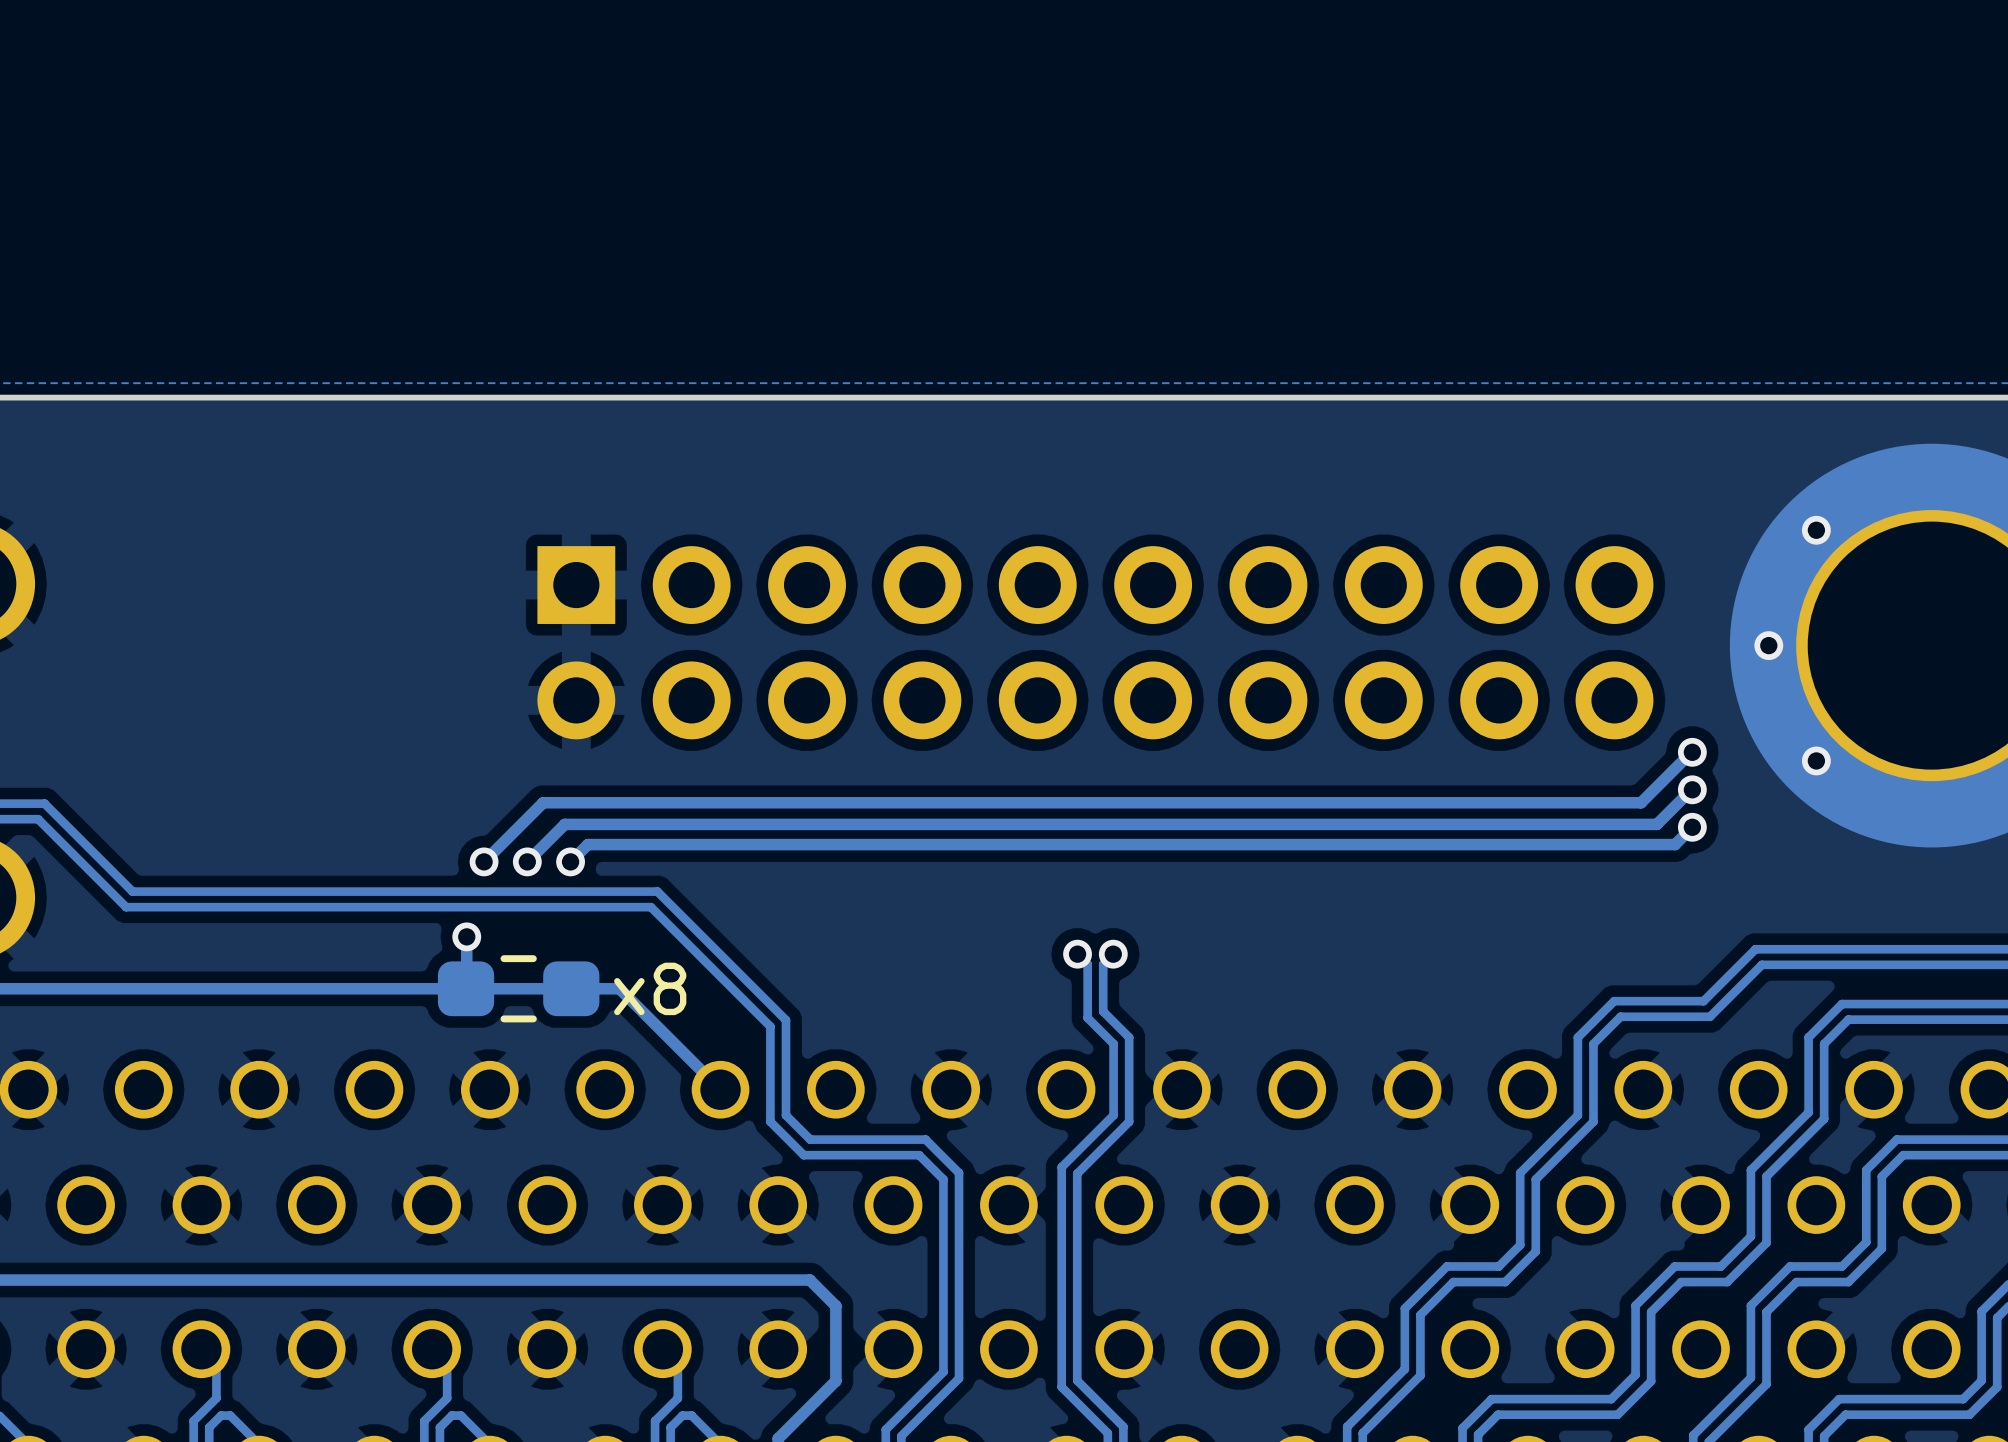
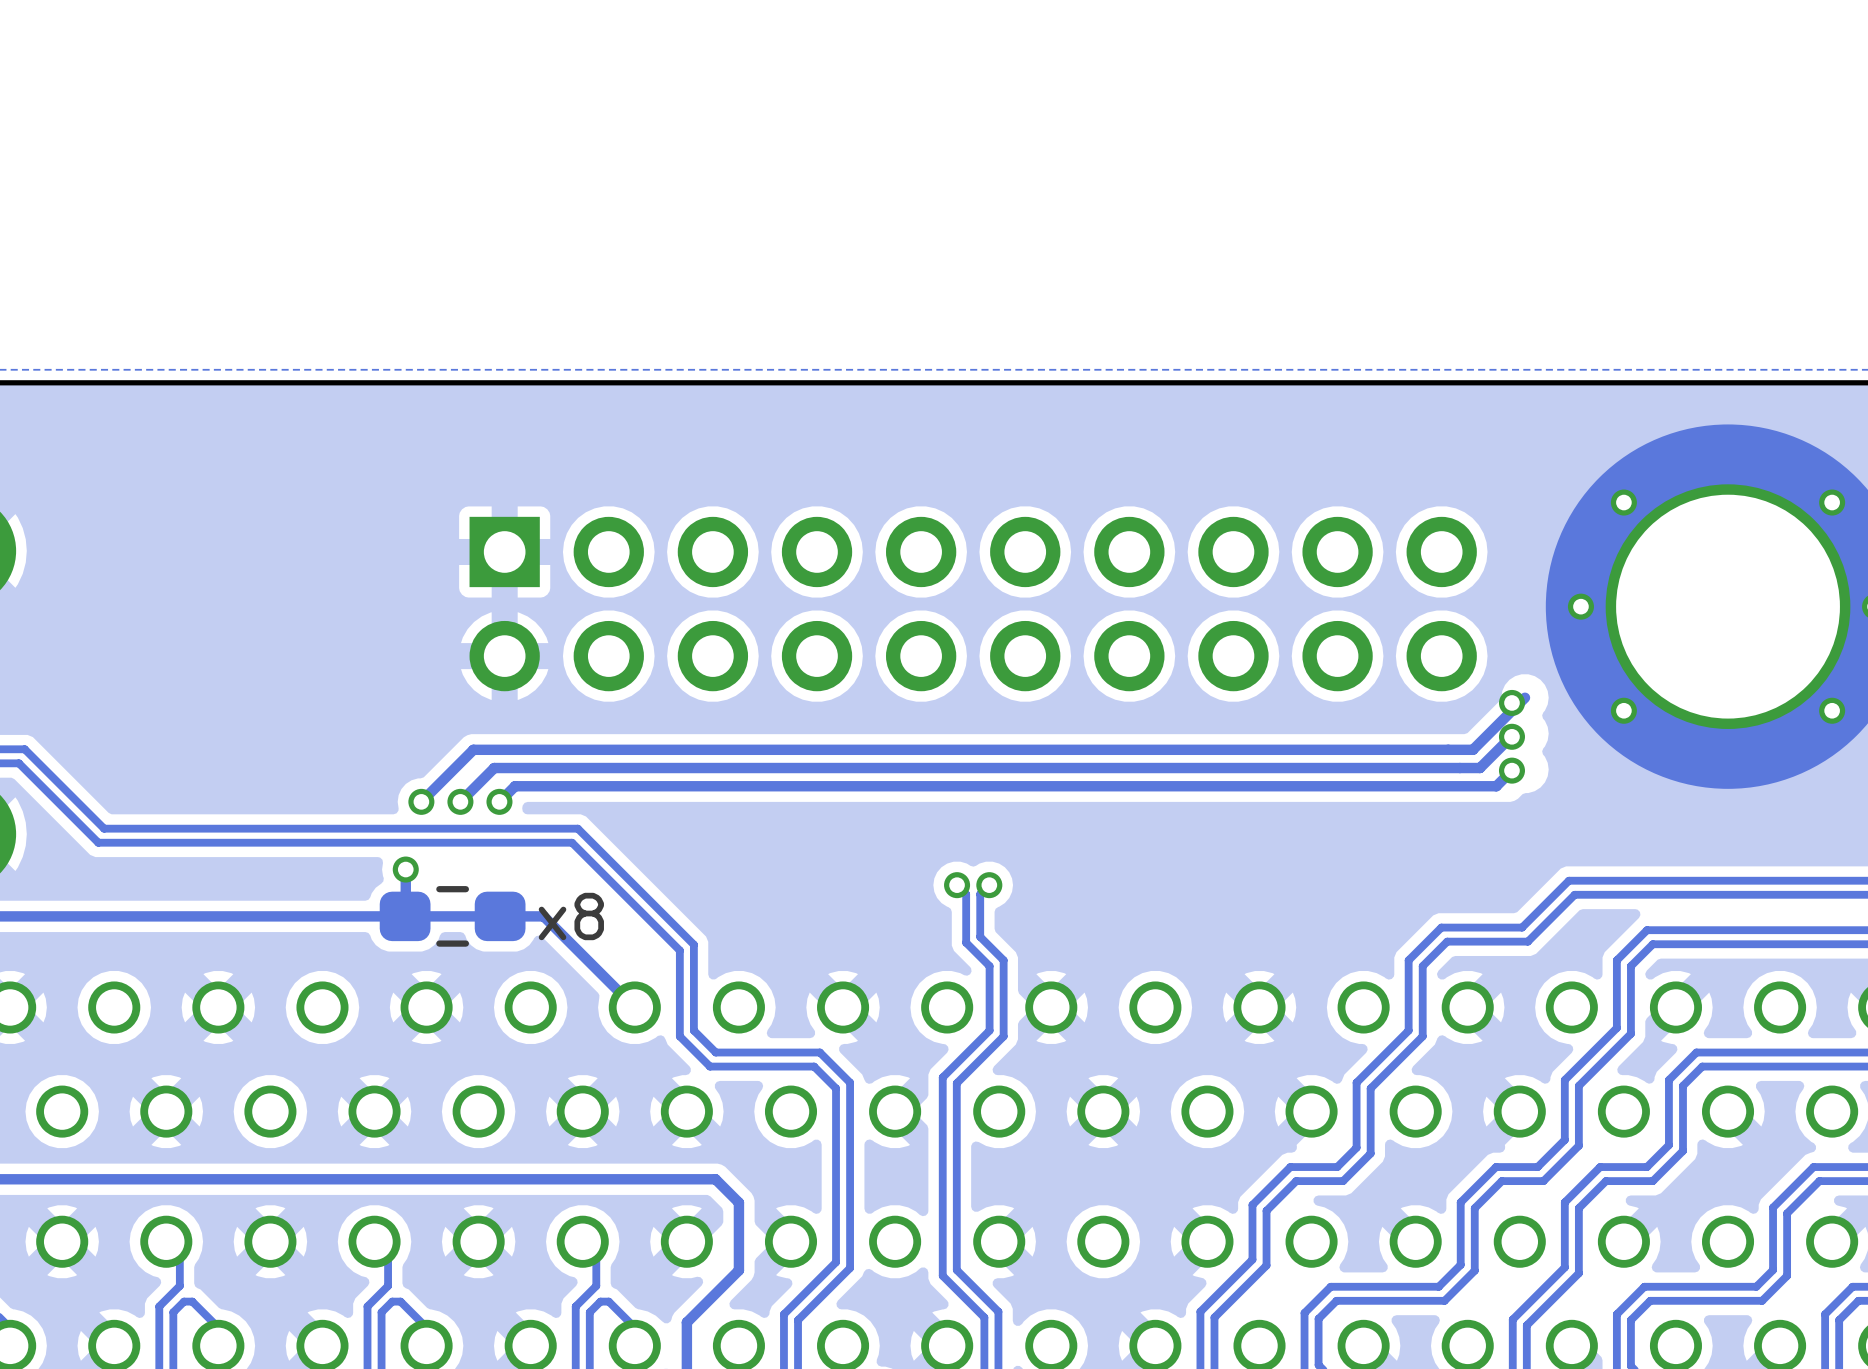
track: (1691, 752) (1641, 802) (541, 804) -> (1524, 697) (1472, 749) (473, 749)

